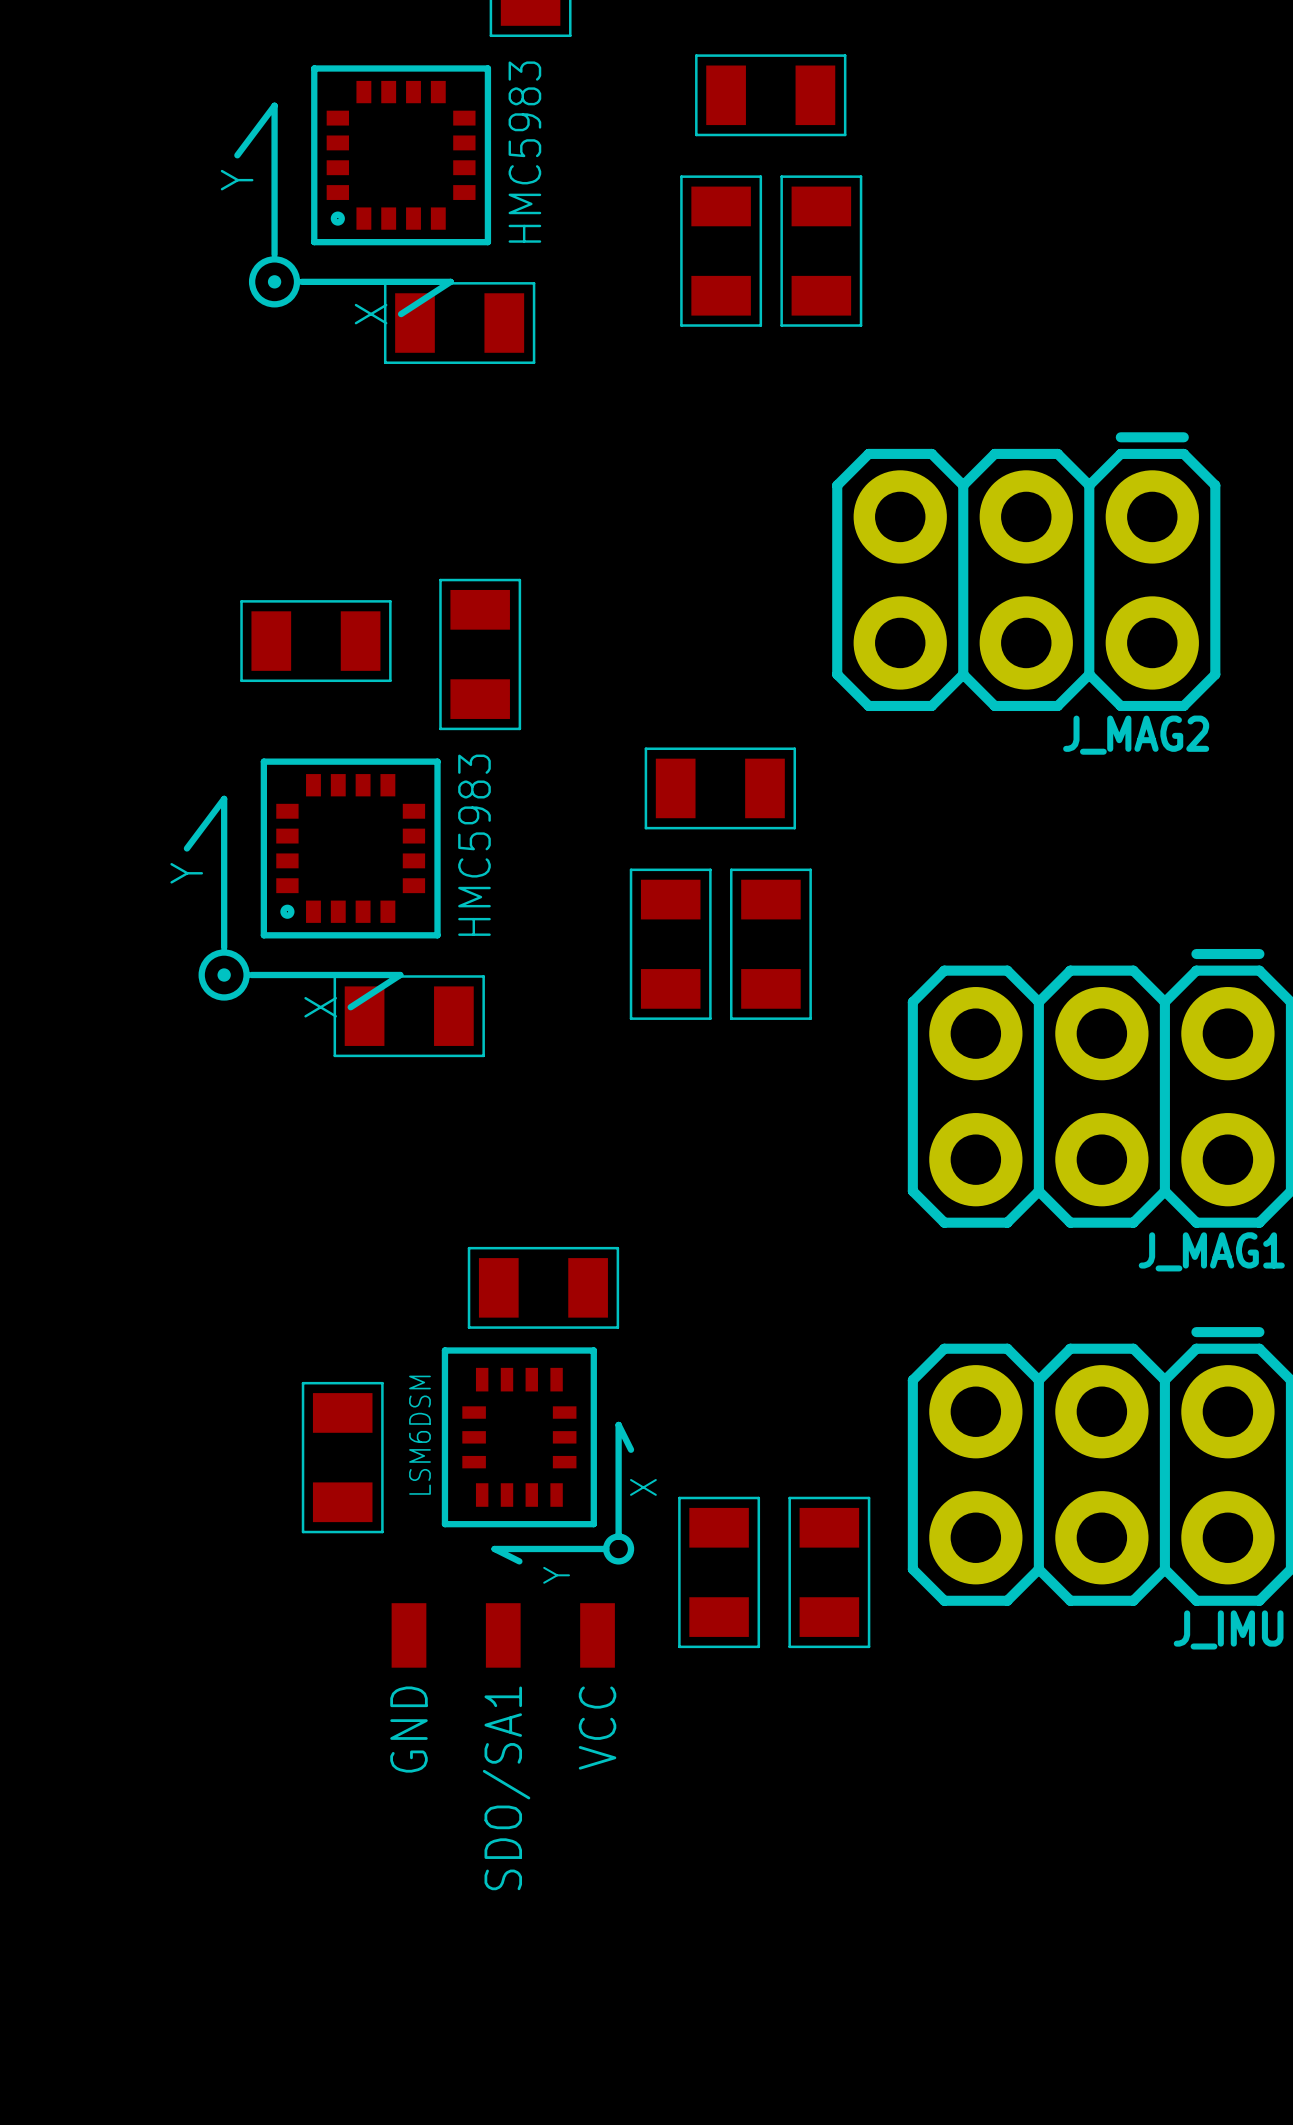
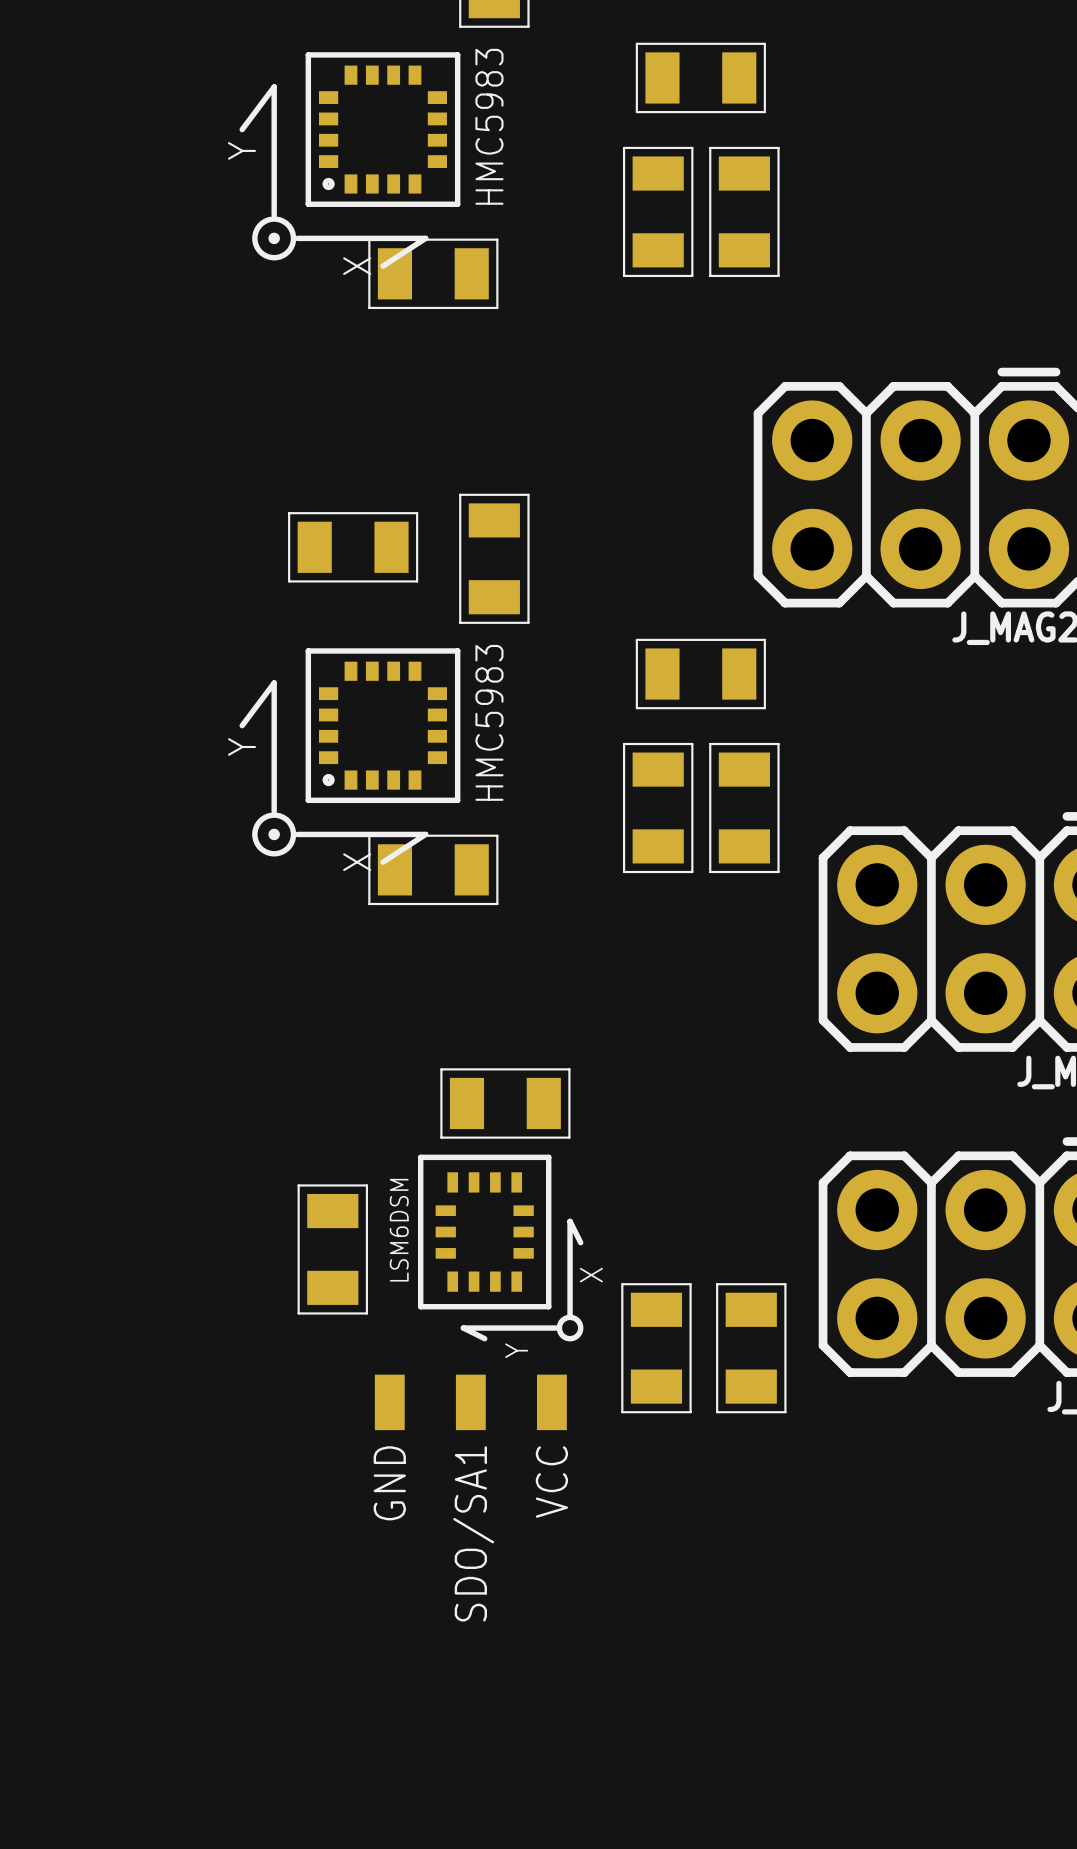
part position: (315, 641) -> (353, 547)
part position: (480, 654) -> (494, 558)
part position: (720, 788) -> (700, 674)
part position: (312, 884) -> (349, 756)
part: (670, 944) -> none
part: none -> (658, 808)
part: (770, 944) -> none
part: none -> (744, 808)
part position: (409, 1016) -> (433, 869)

